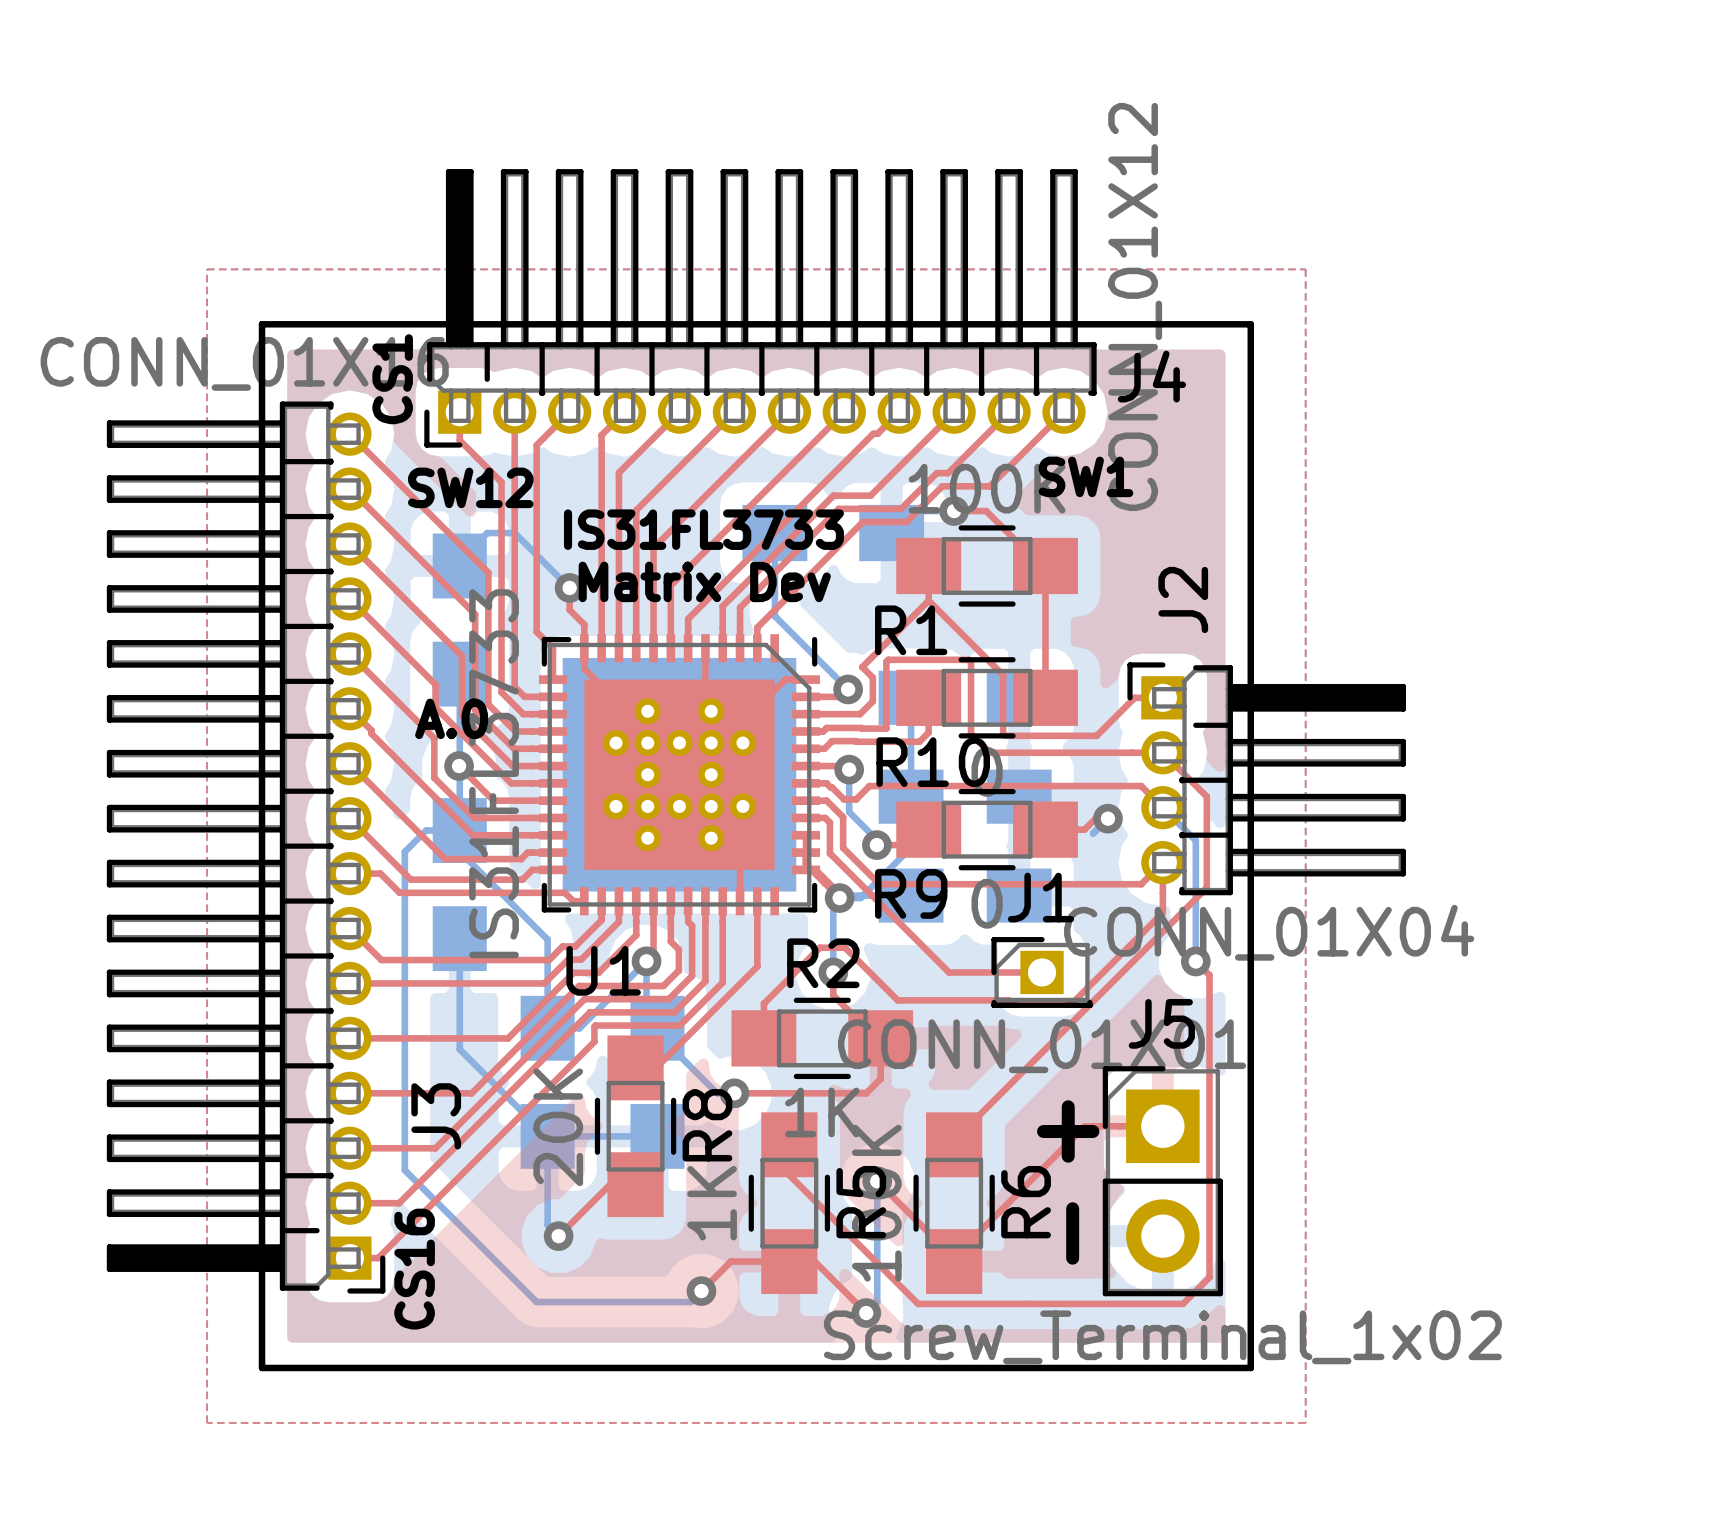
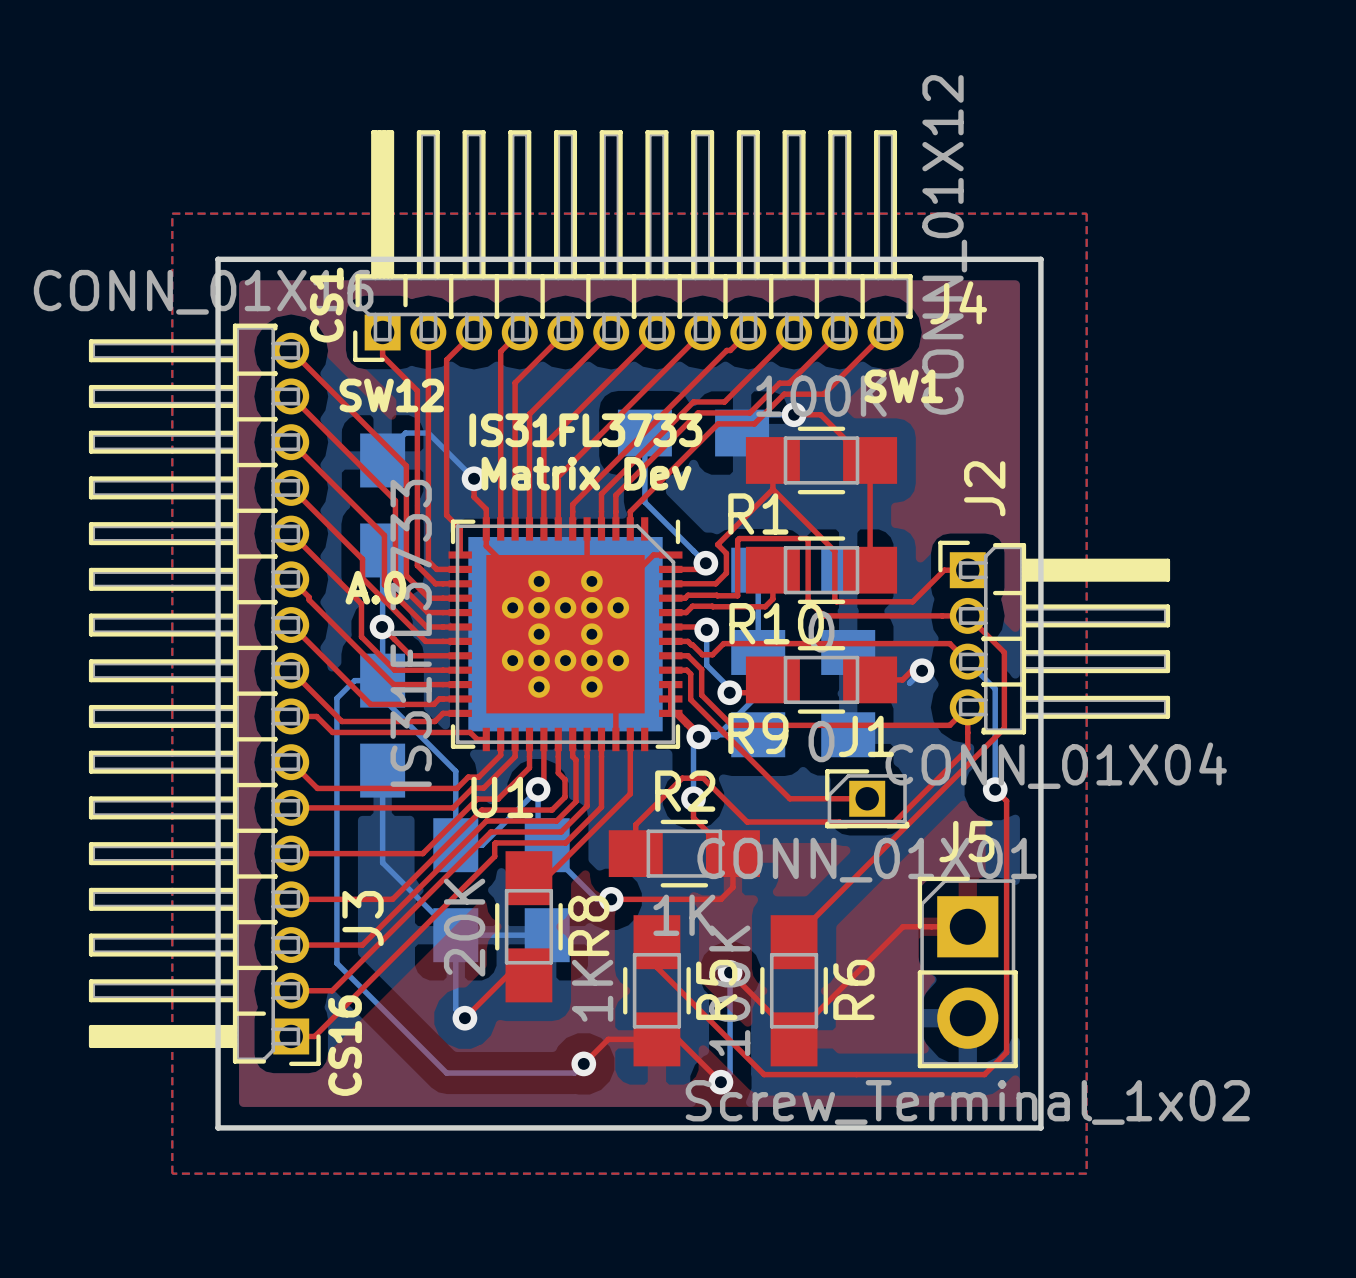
text: + (1068, 1131) -> none
text: - (1072, 1233) -> none

